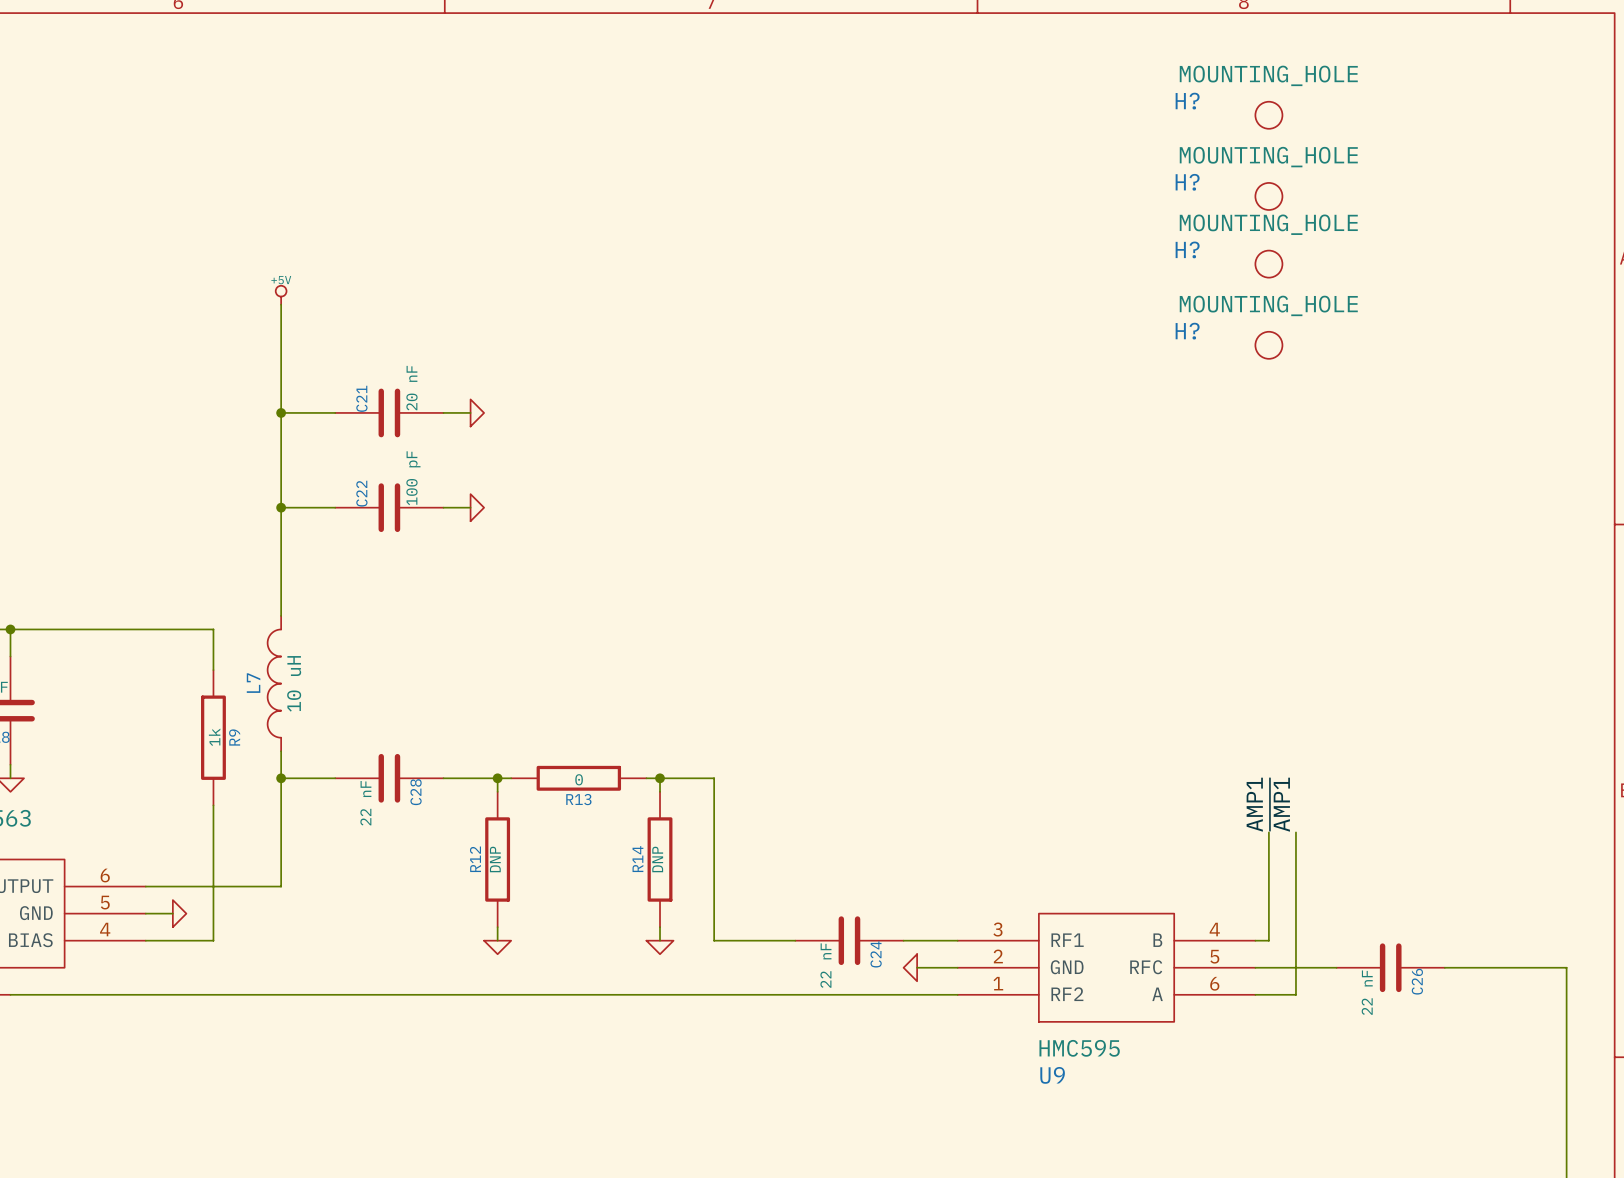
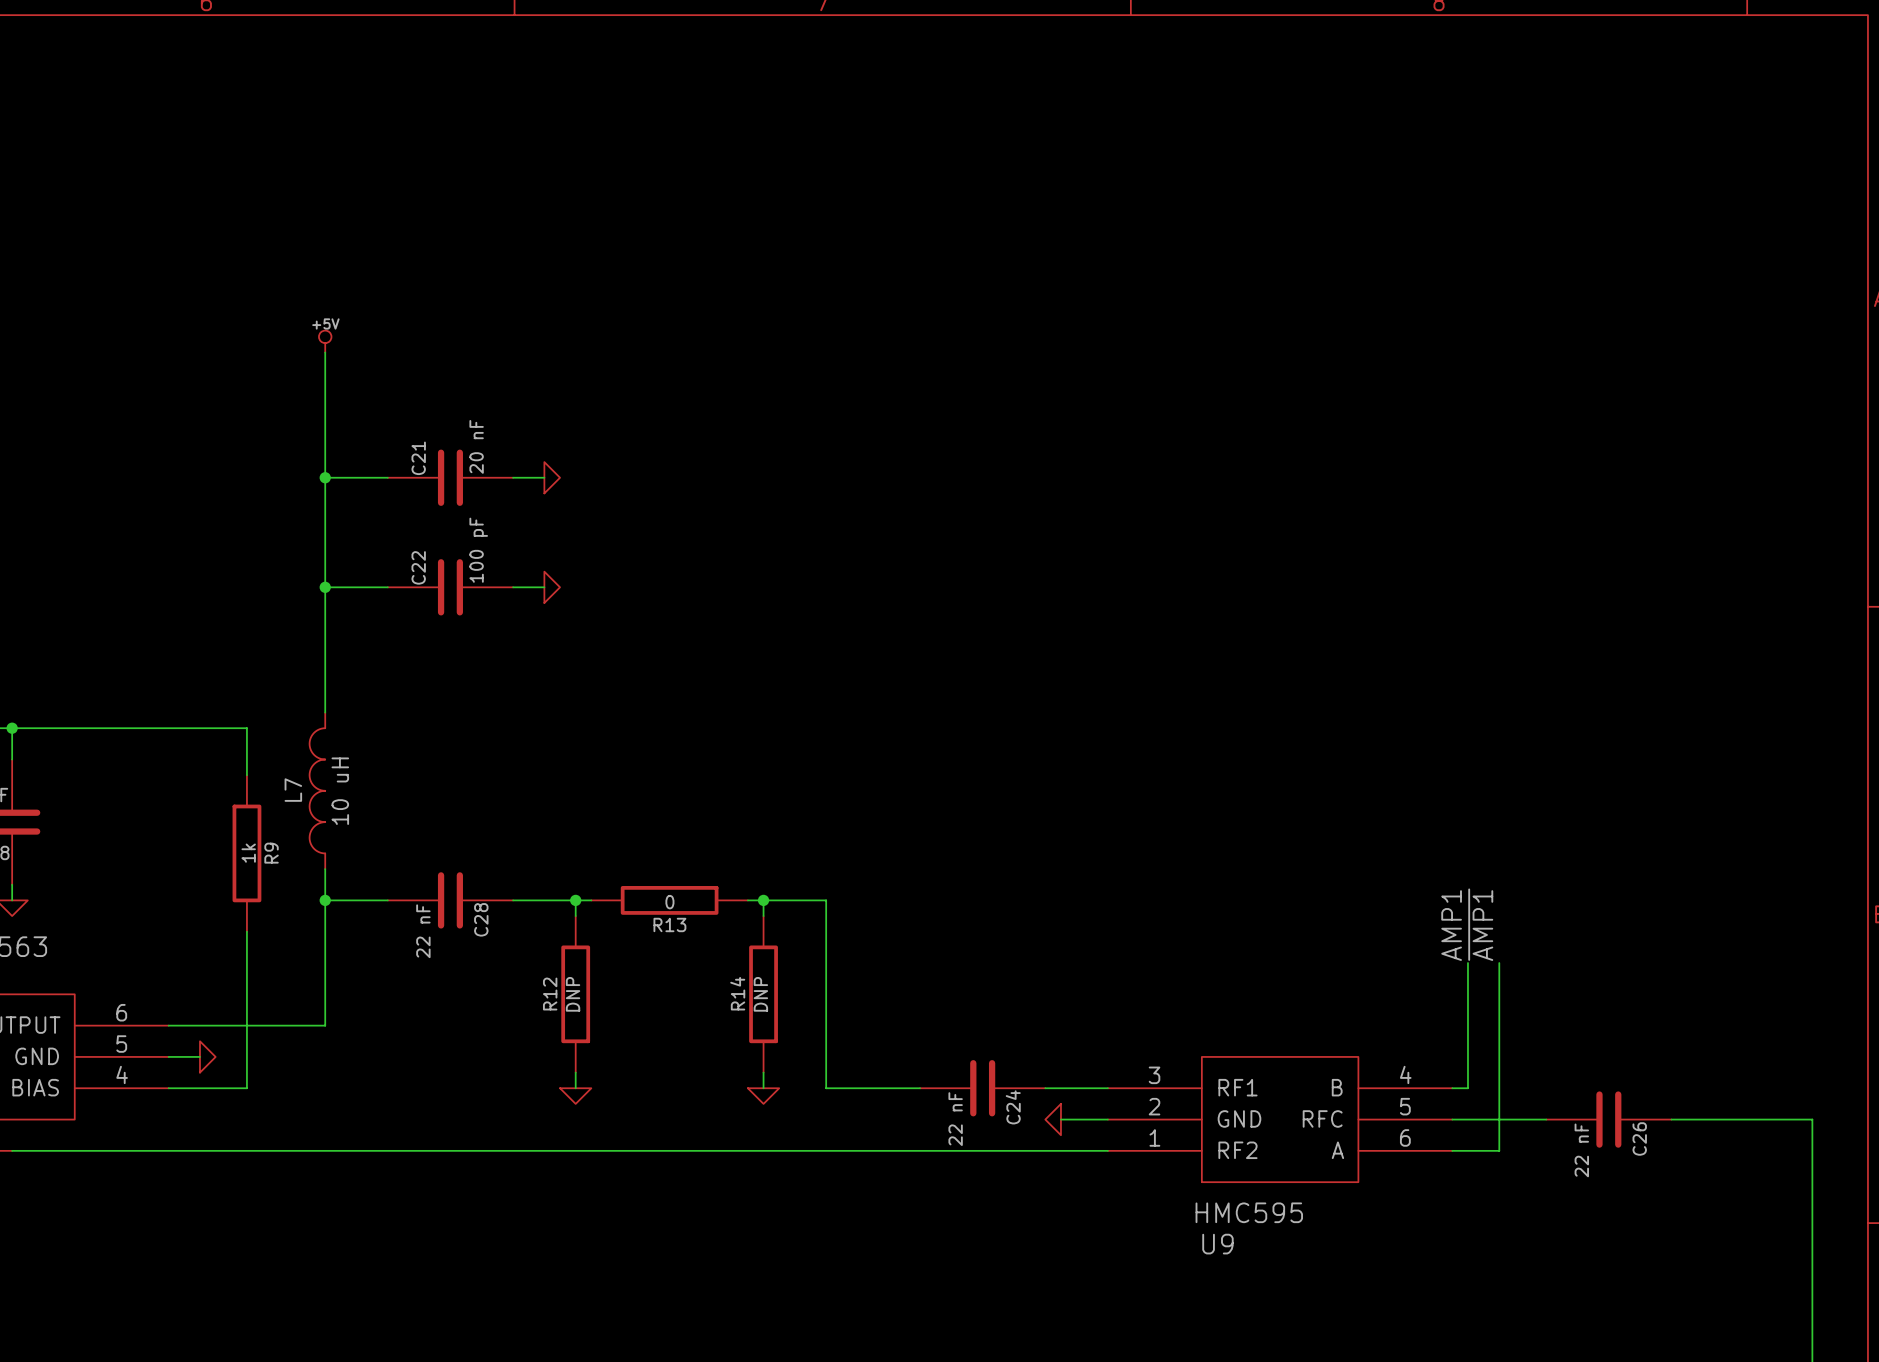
H?: MOUNTING_HOLE (1268, 115) -> none
H?: MOUNTING_HOLE (1268, 196) -> none
H?: MOUNTING_HOLE (1268, 264) -> none
H?: MOUNTING_HOLE (1268, 345) -> none

